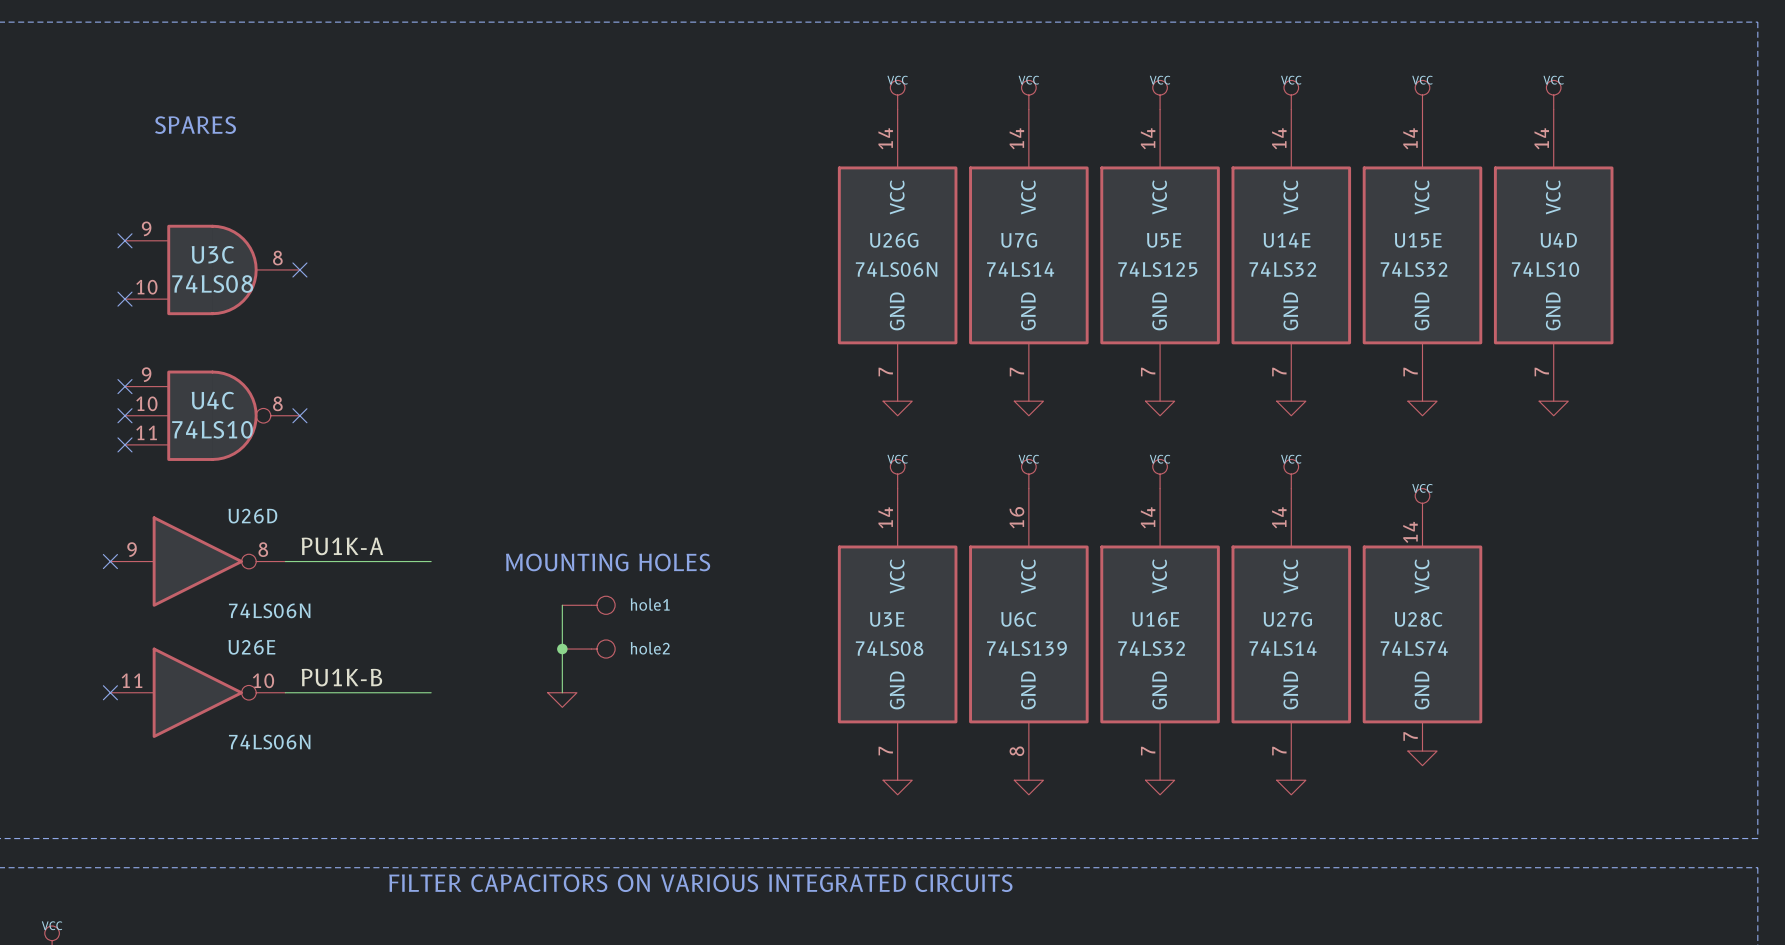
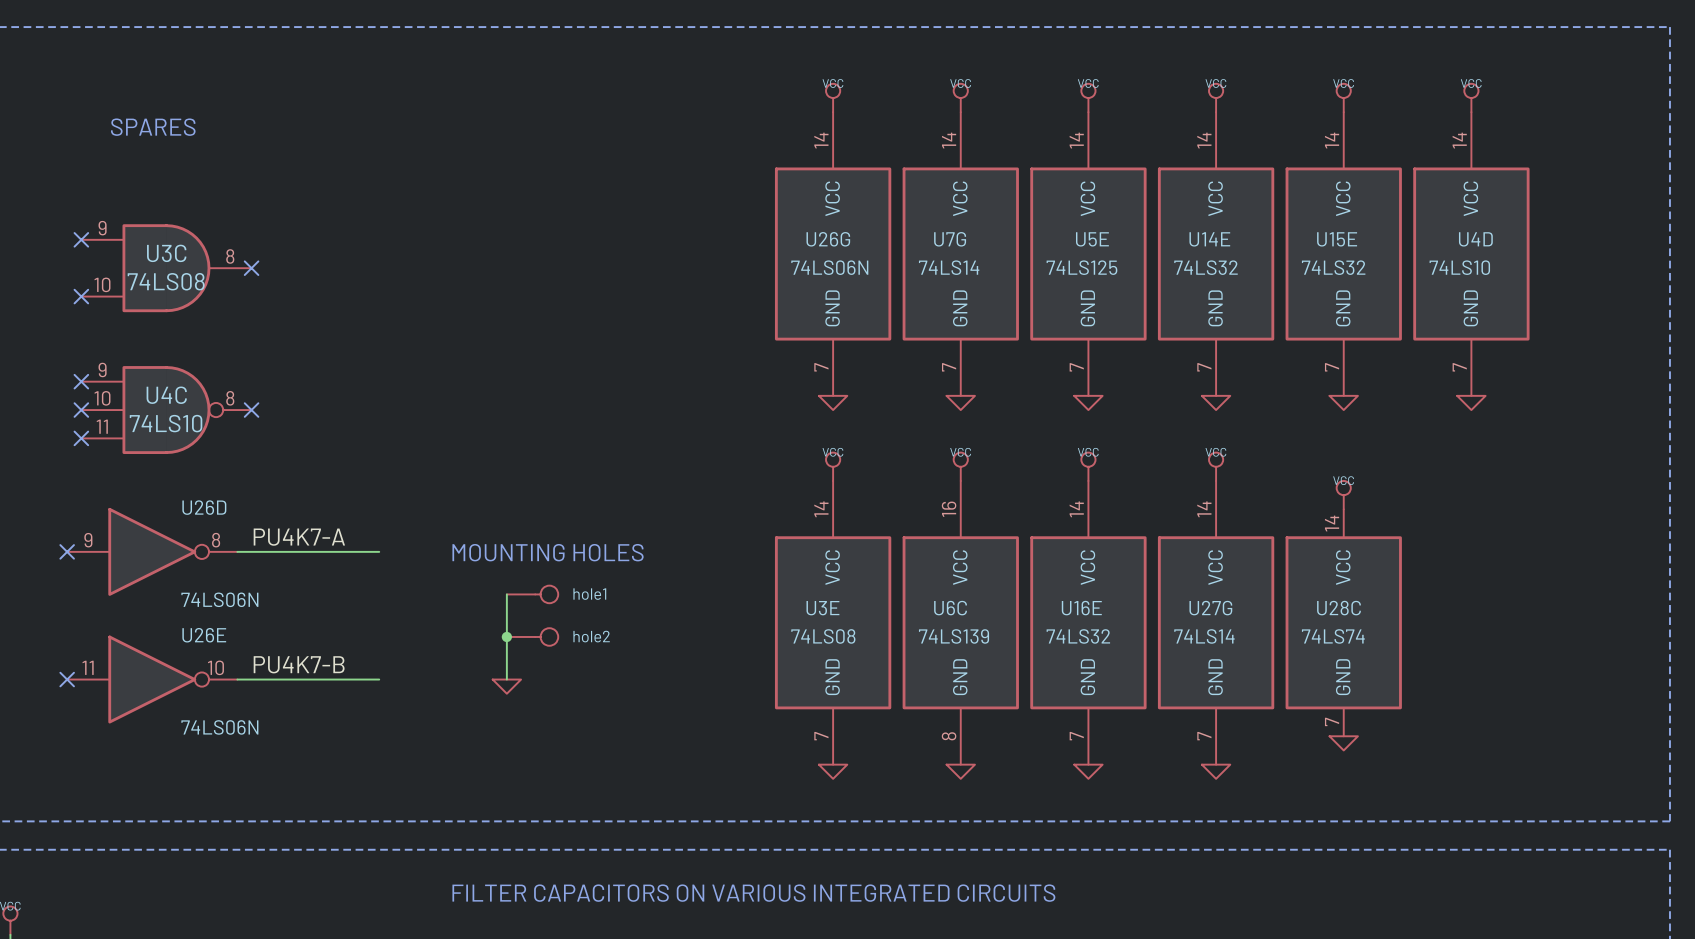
label: PU1K-A (342, 546) -> PU4K7-A (299, 537)
label: PU1K-B (341, 677) -> PU4K7-B (299, 664)
text position: FILTER CAPACITORS ON VARIOUS INTEGRATED CIRCUITS (700, 883) -> FILTER CAPACITORS ON VARIOUS INTEGRATED CIRCUITS (753, 893)

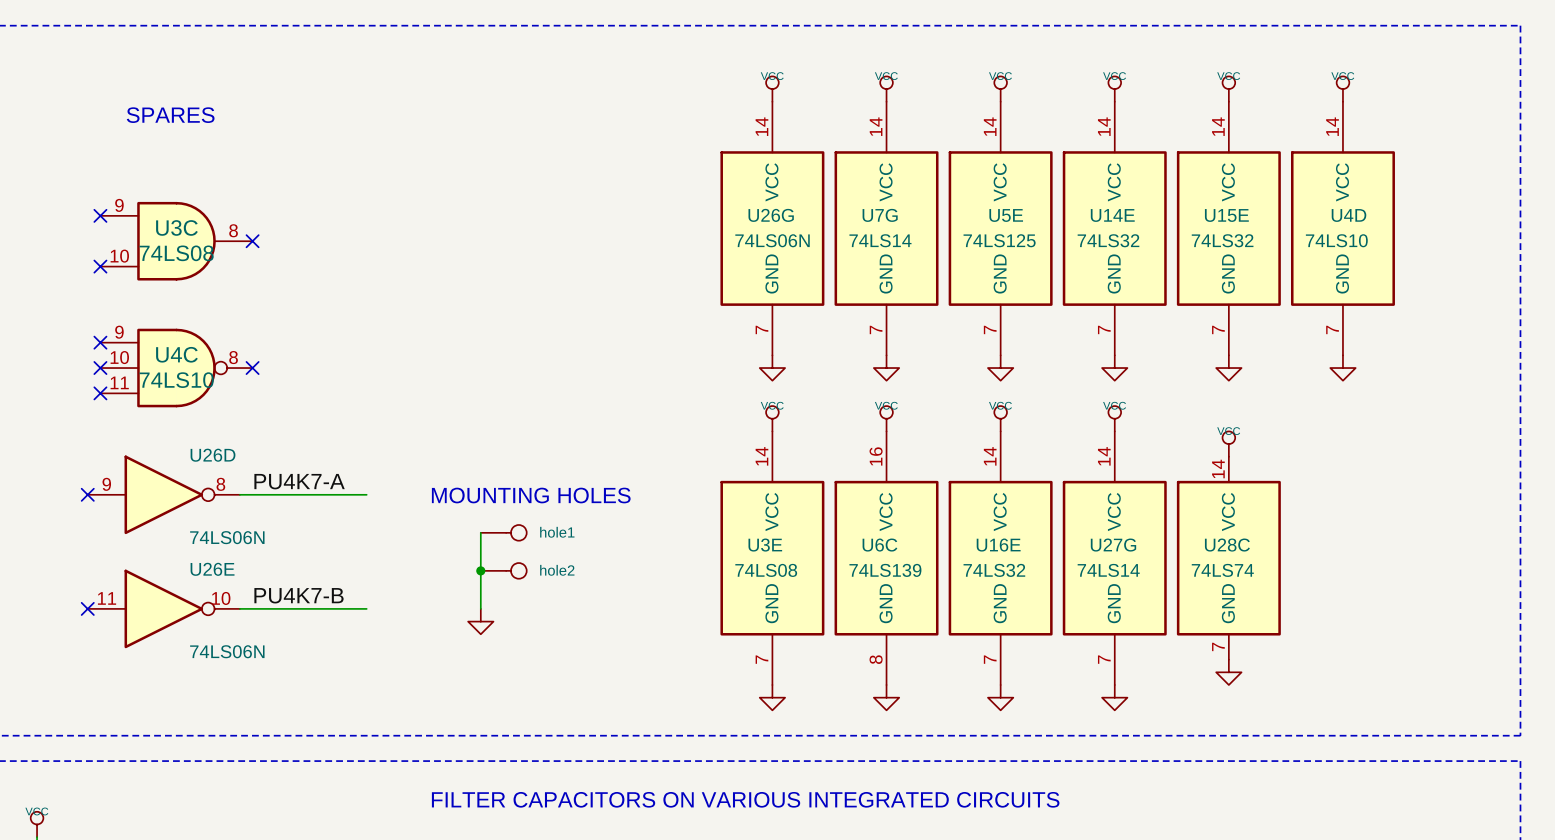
power symbol shape: [818, 395, 848, 411] -> [759, 355, 786, 381]
power symbol shape: [946, 395, 975, 411] -> [873, 355, 900, 381]
power symbol shape: [1074, 395, 1103, 411] -> [987, 355, 1014, 381]
power symbol shape: [1201, 395, 1231, 411] -> [1102, 355, 1128, 381]
power symbol shape: [1329, 395, 1358, 411] -> [1216, 355, 1242, 381]
power symbol shape: [1457, 395, 1486, 411] -> [1330, 355, 1356, 381]
power symbol shape: [492, 679, 522, 694] -> [468, 608, 494, 635]
power symbol shape: [1329, 736, 1358, 751] -> [1216, 659, 1242, 685]
power symbol shape: [818, 764, 848, 779] -> [759, 684, 786, 711]
power symbol shape: [946, 764, 975, 779] -> [873, 684, 900, 711]
power symbol shape: [1074, 764, 1103, 779] -> [987, 684, 1014, 711]
power symbol shape: [1201, 764, 1231, 779] -> [1102, 684, 1128, 711]

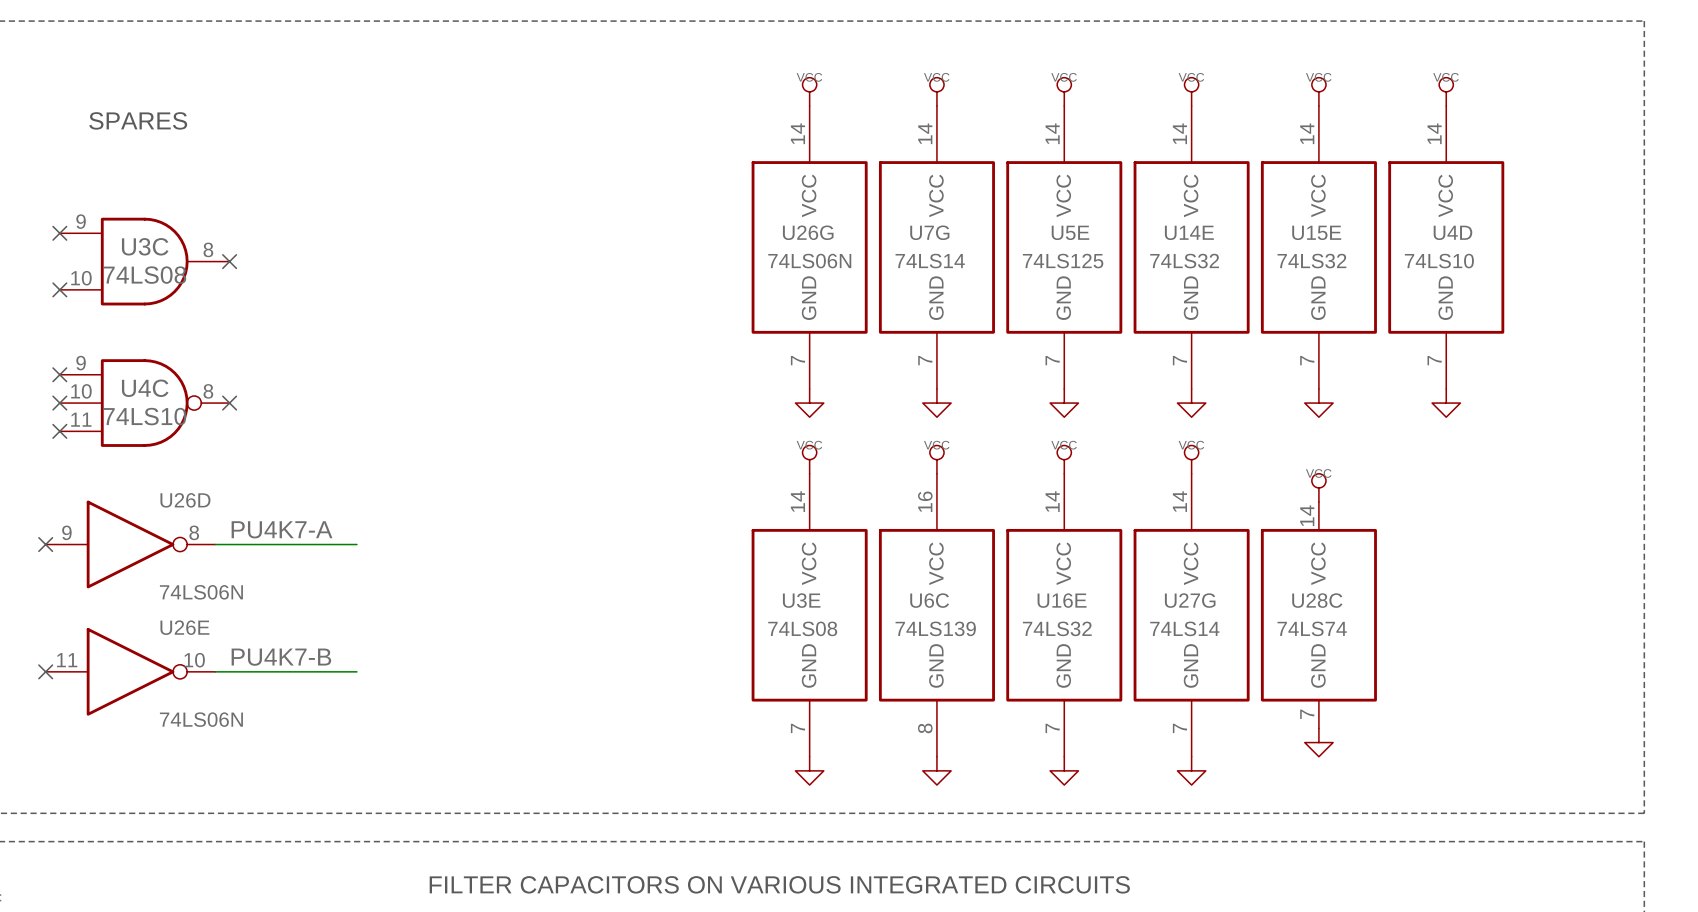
text: MOUNTING HOLES (531, 495) -> none
wire: (480, 532) (480, 608) -> none
hole1: (503, 532) -> none
junction: (480, 570) -> none
hole2: (503, 570) -> none
power symbol: (480, 621) -> none

